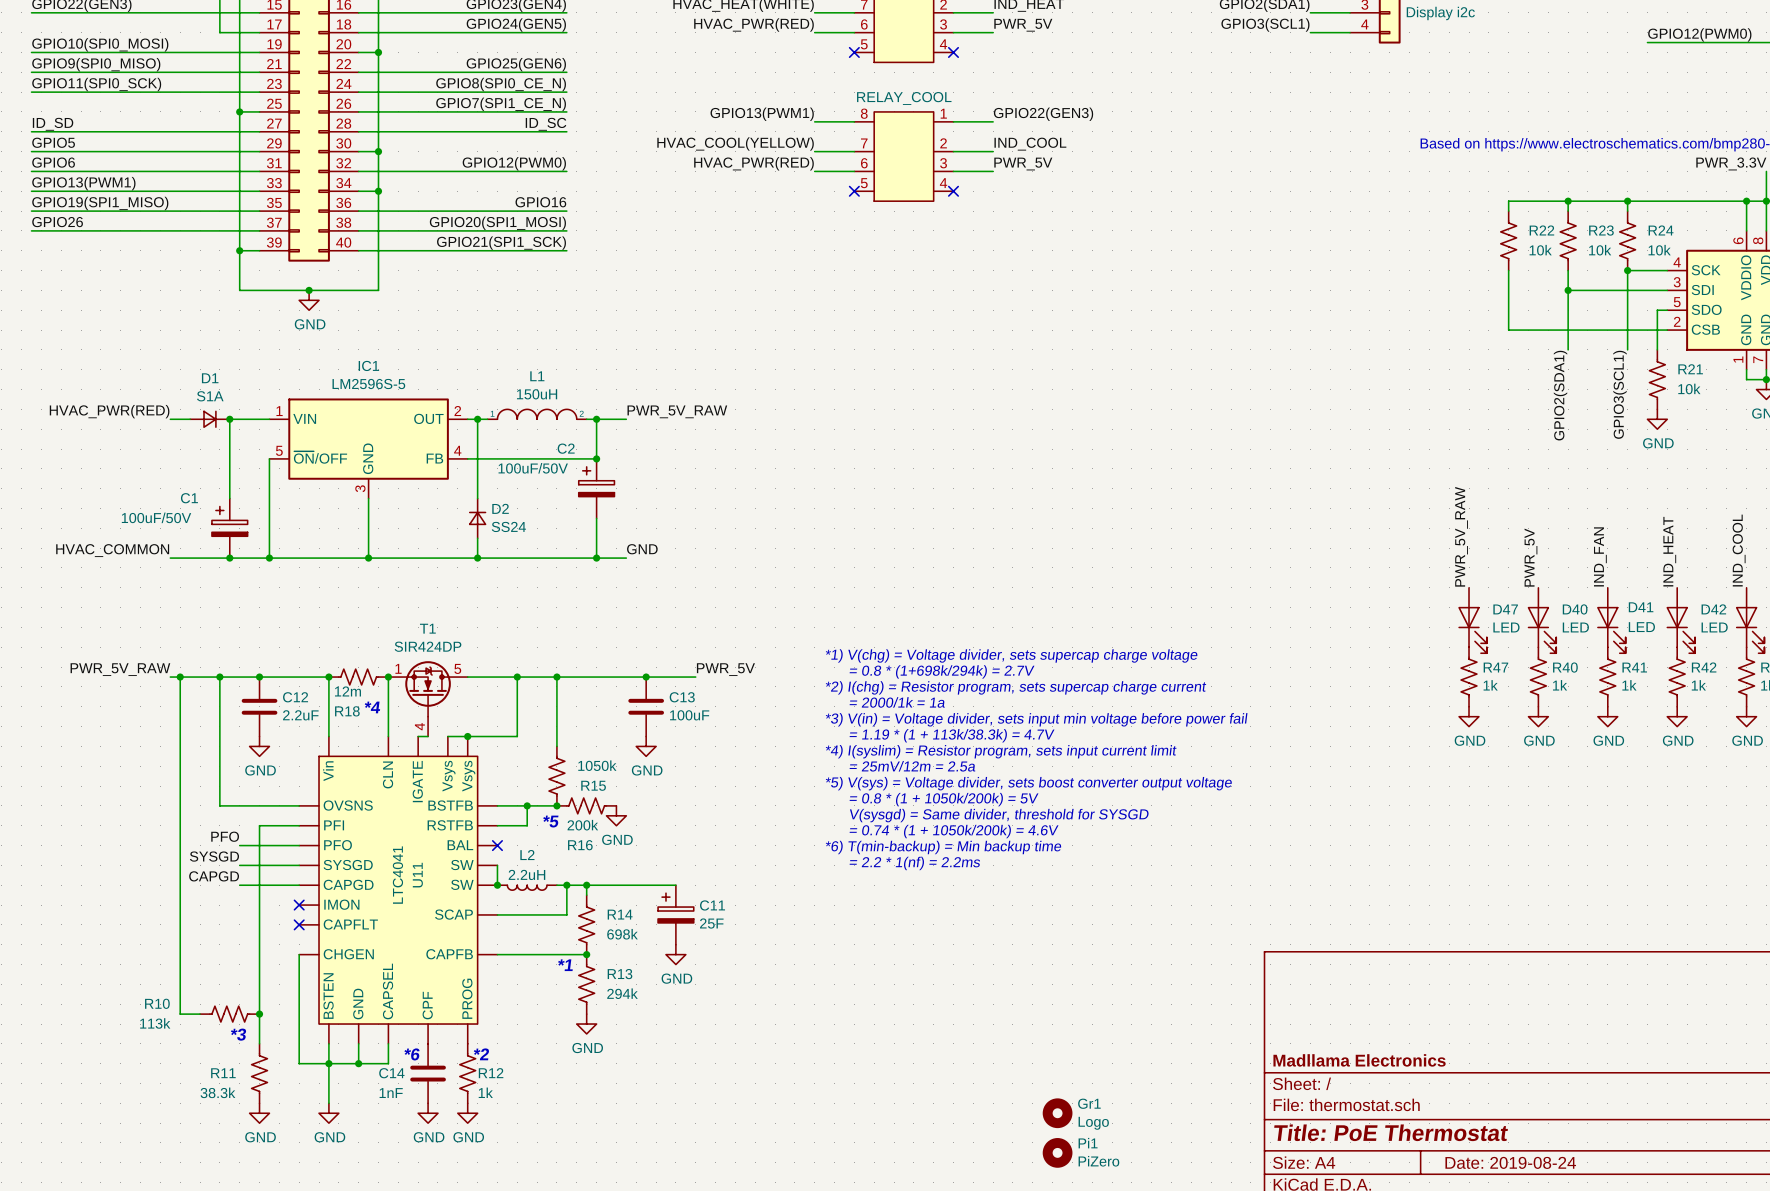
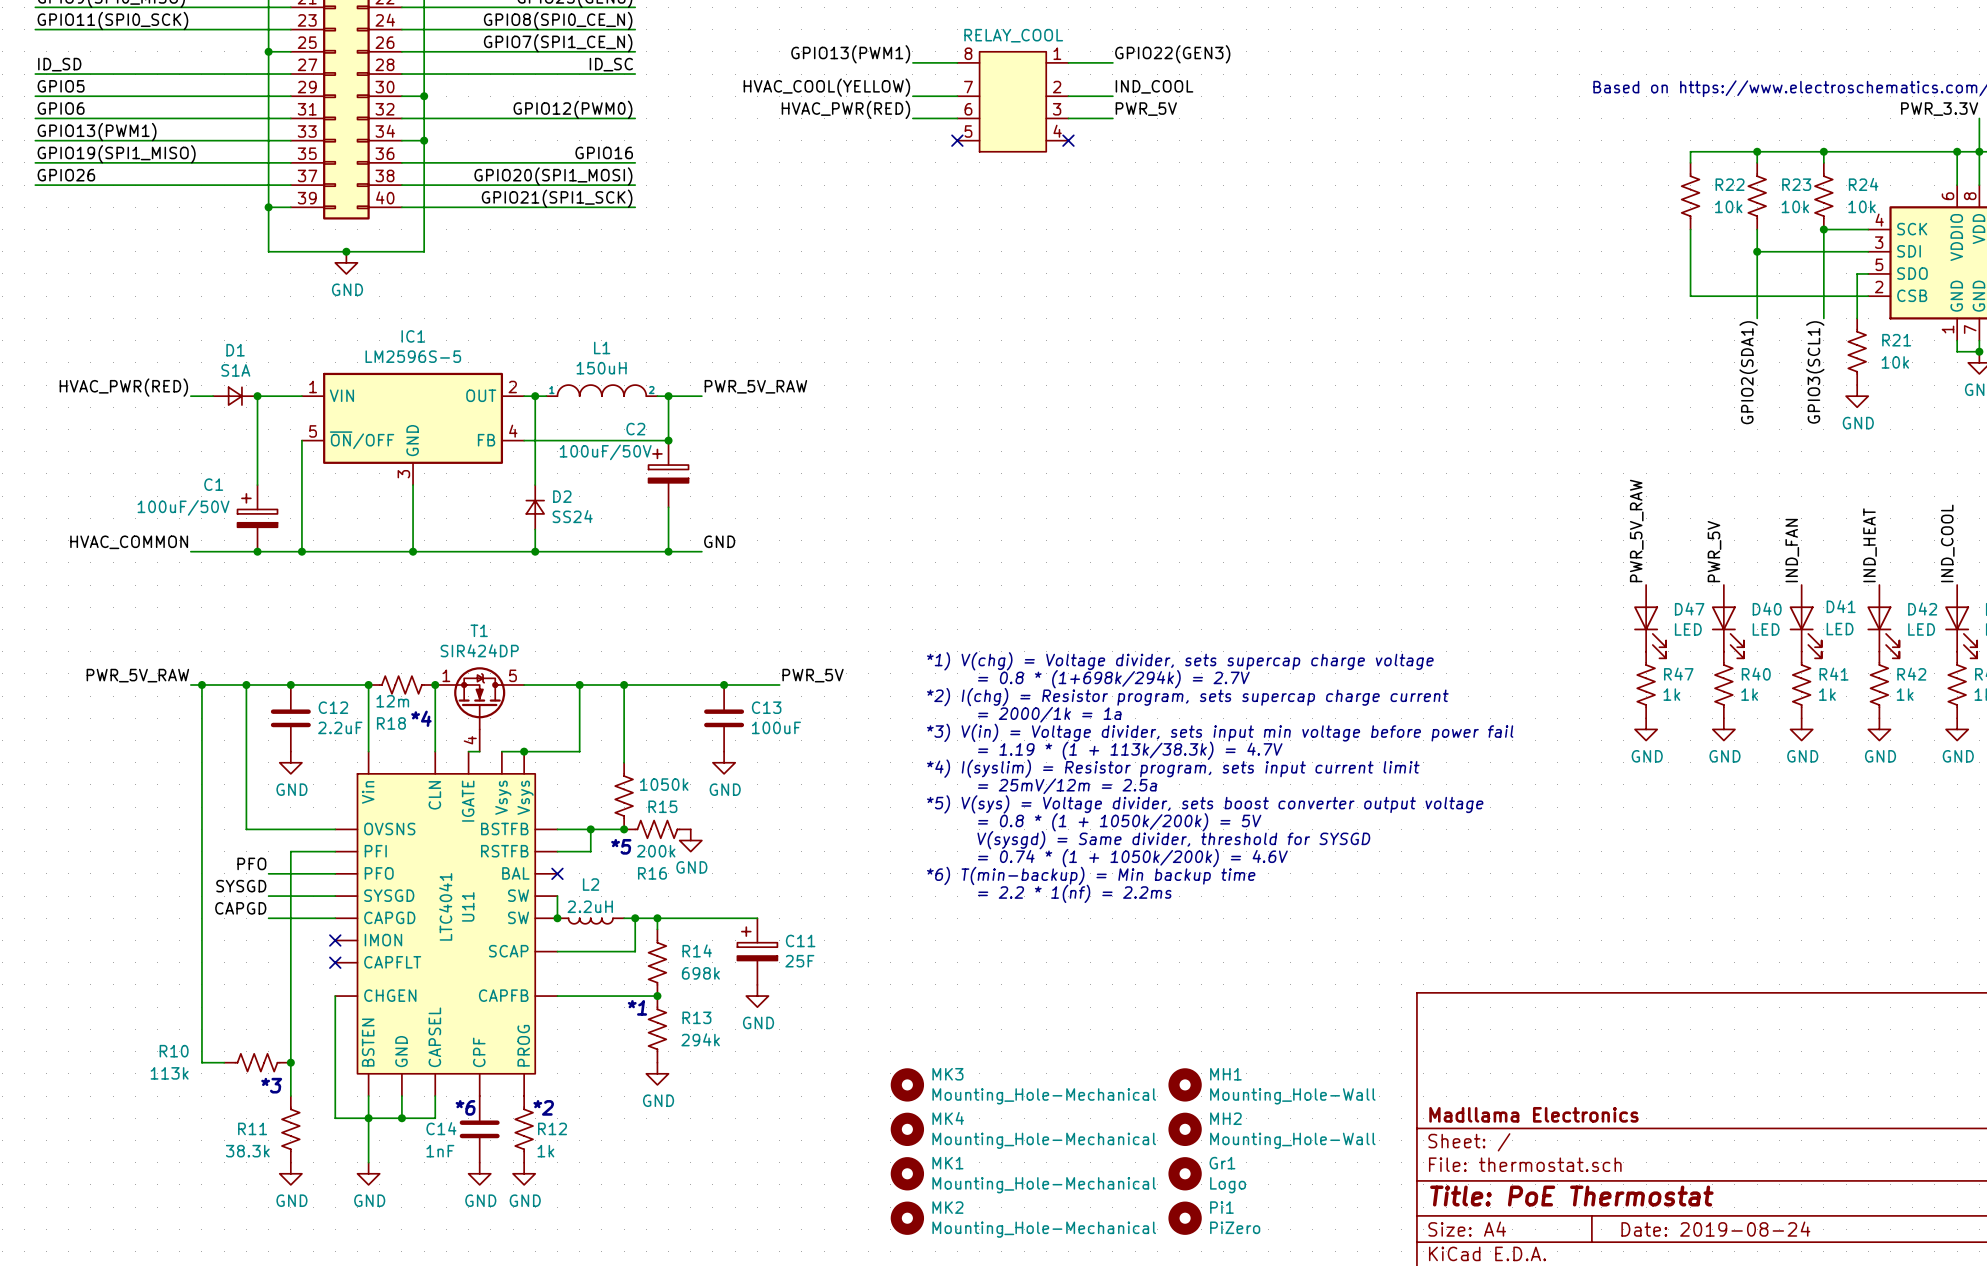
MK3: none -> Mounting_Hole-Mechanical (907, 1084)
MH1: none -> Mounting_Hole-Wall (1185, 1084)
MK4: none -> Mounting_Hole-Mechanical (907, 1129)
MH2: none -> Mounting_Hole-Wall (1185, 1129)
MK1: none -> Mounting_Hole-Mechanical (907, 1173)
MK2: none -> Mounting_Hole-Mechanical (907, 1218)

